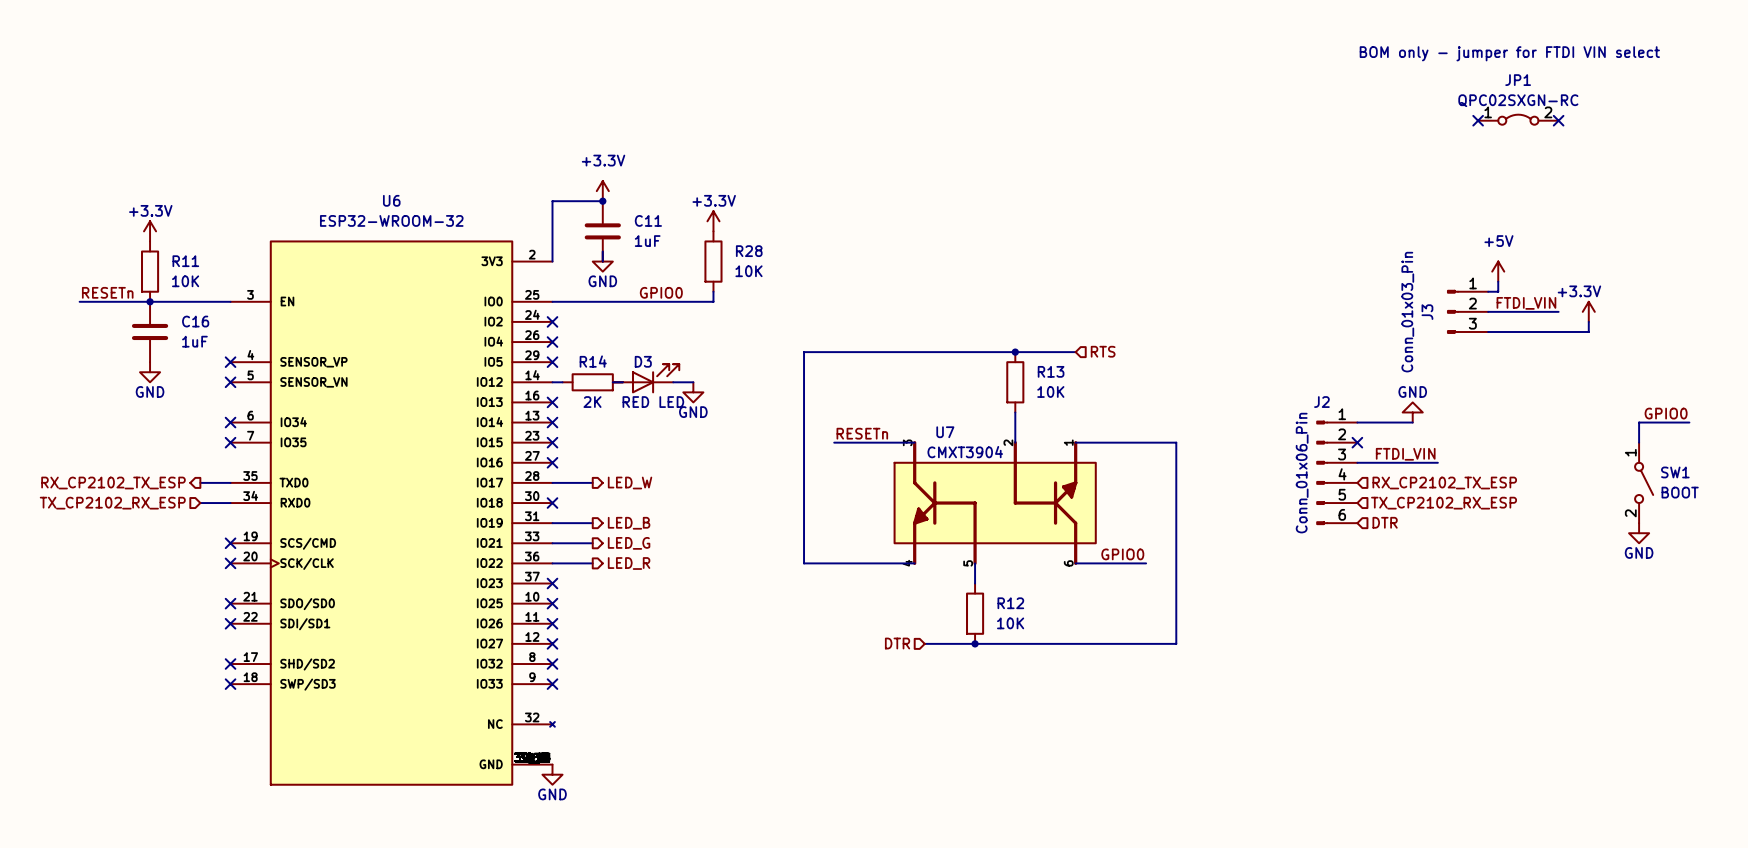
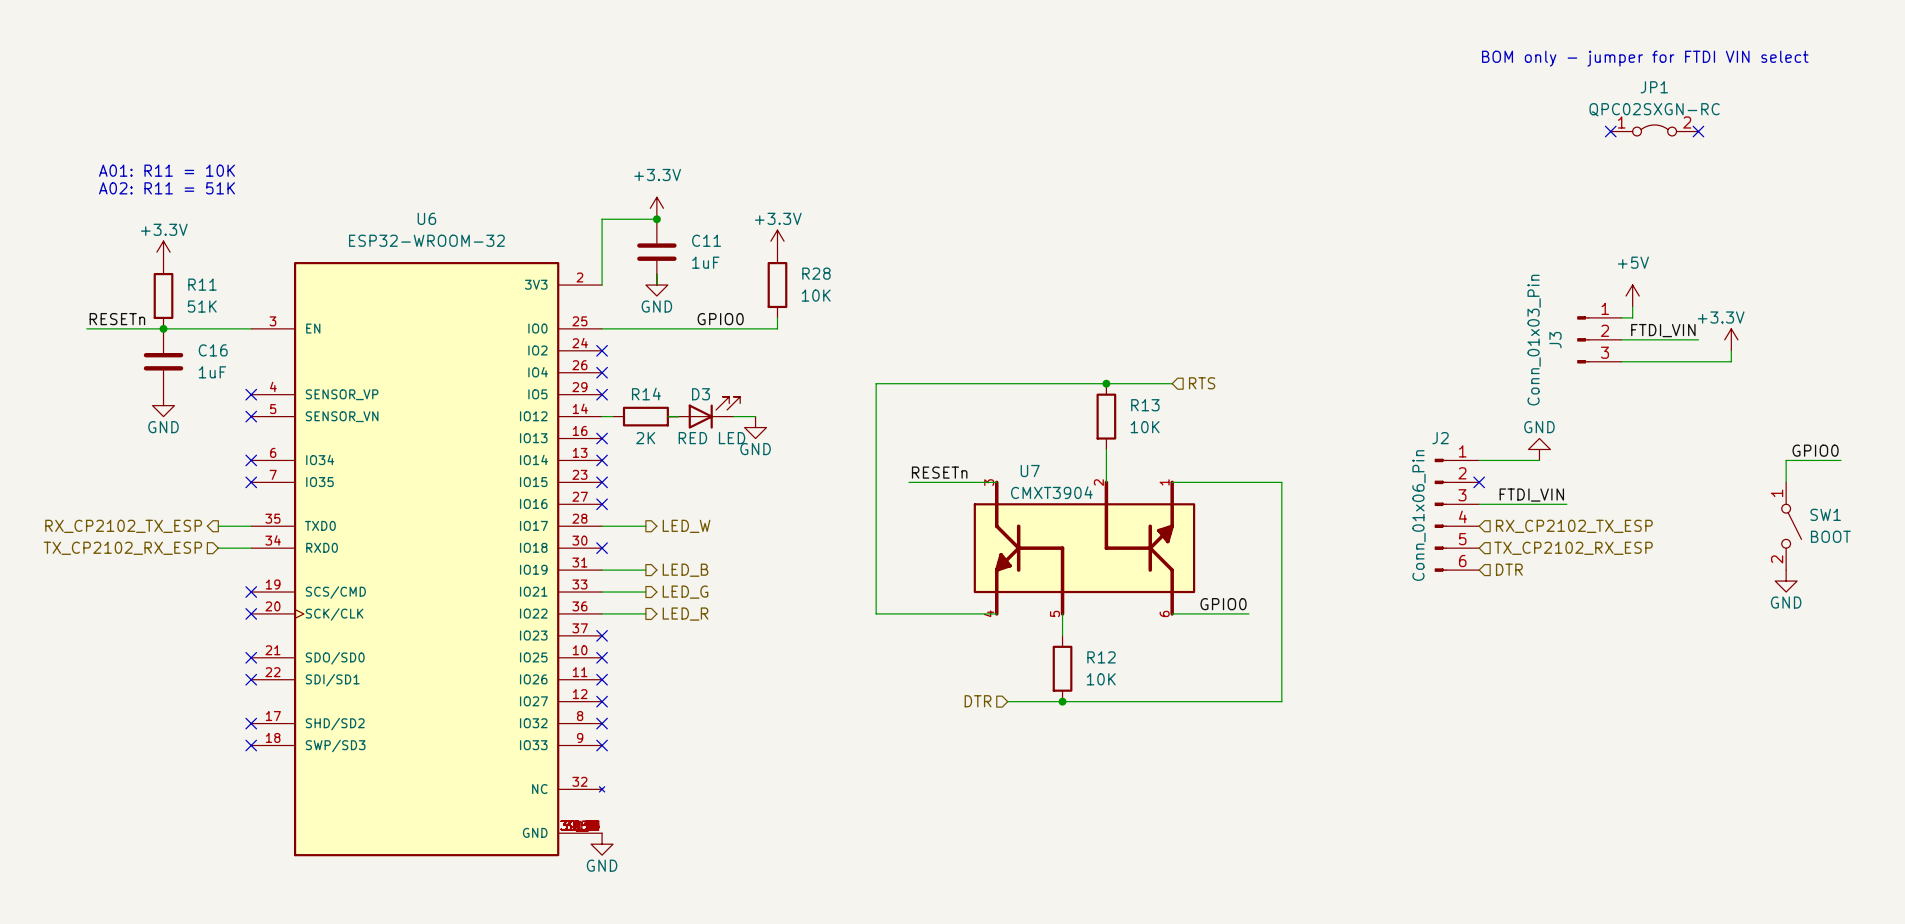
text: none -> A01: R11 = 10K (166, 170)
text: none -> A02: R11 = 51K (166, 188)
R11 value: 10K (185, 281) -> 51K (202, 306)

